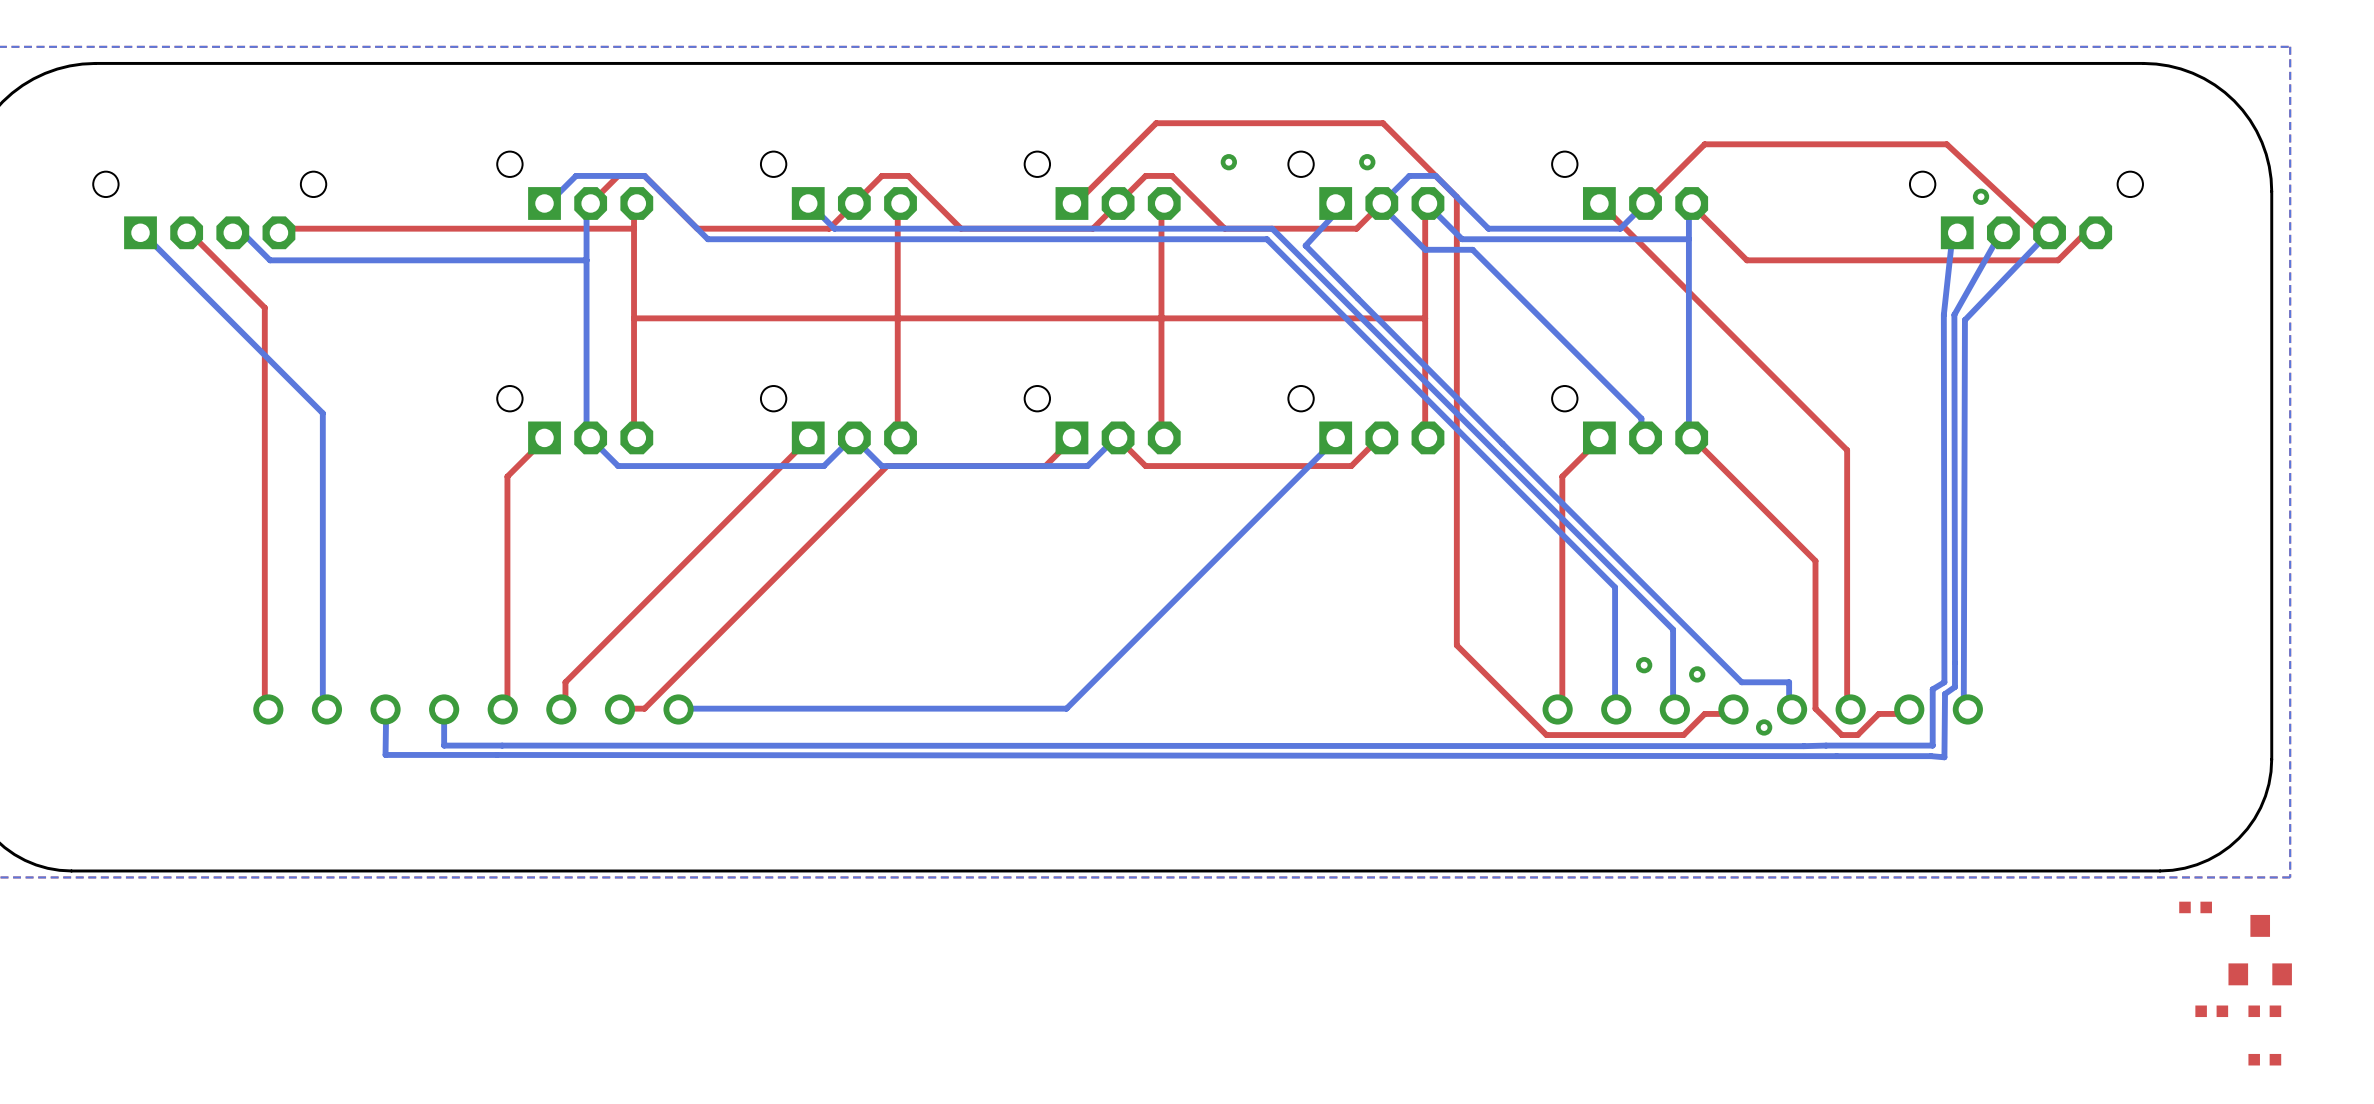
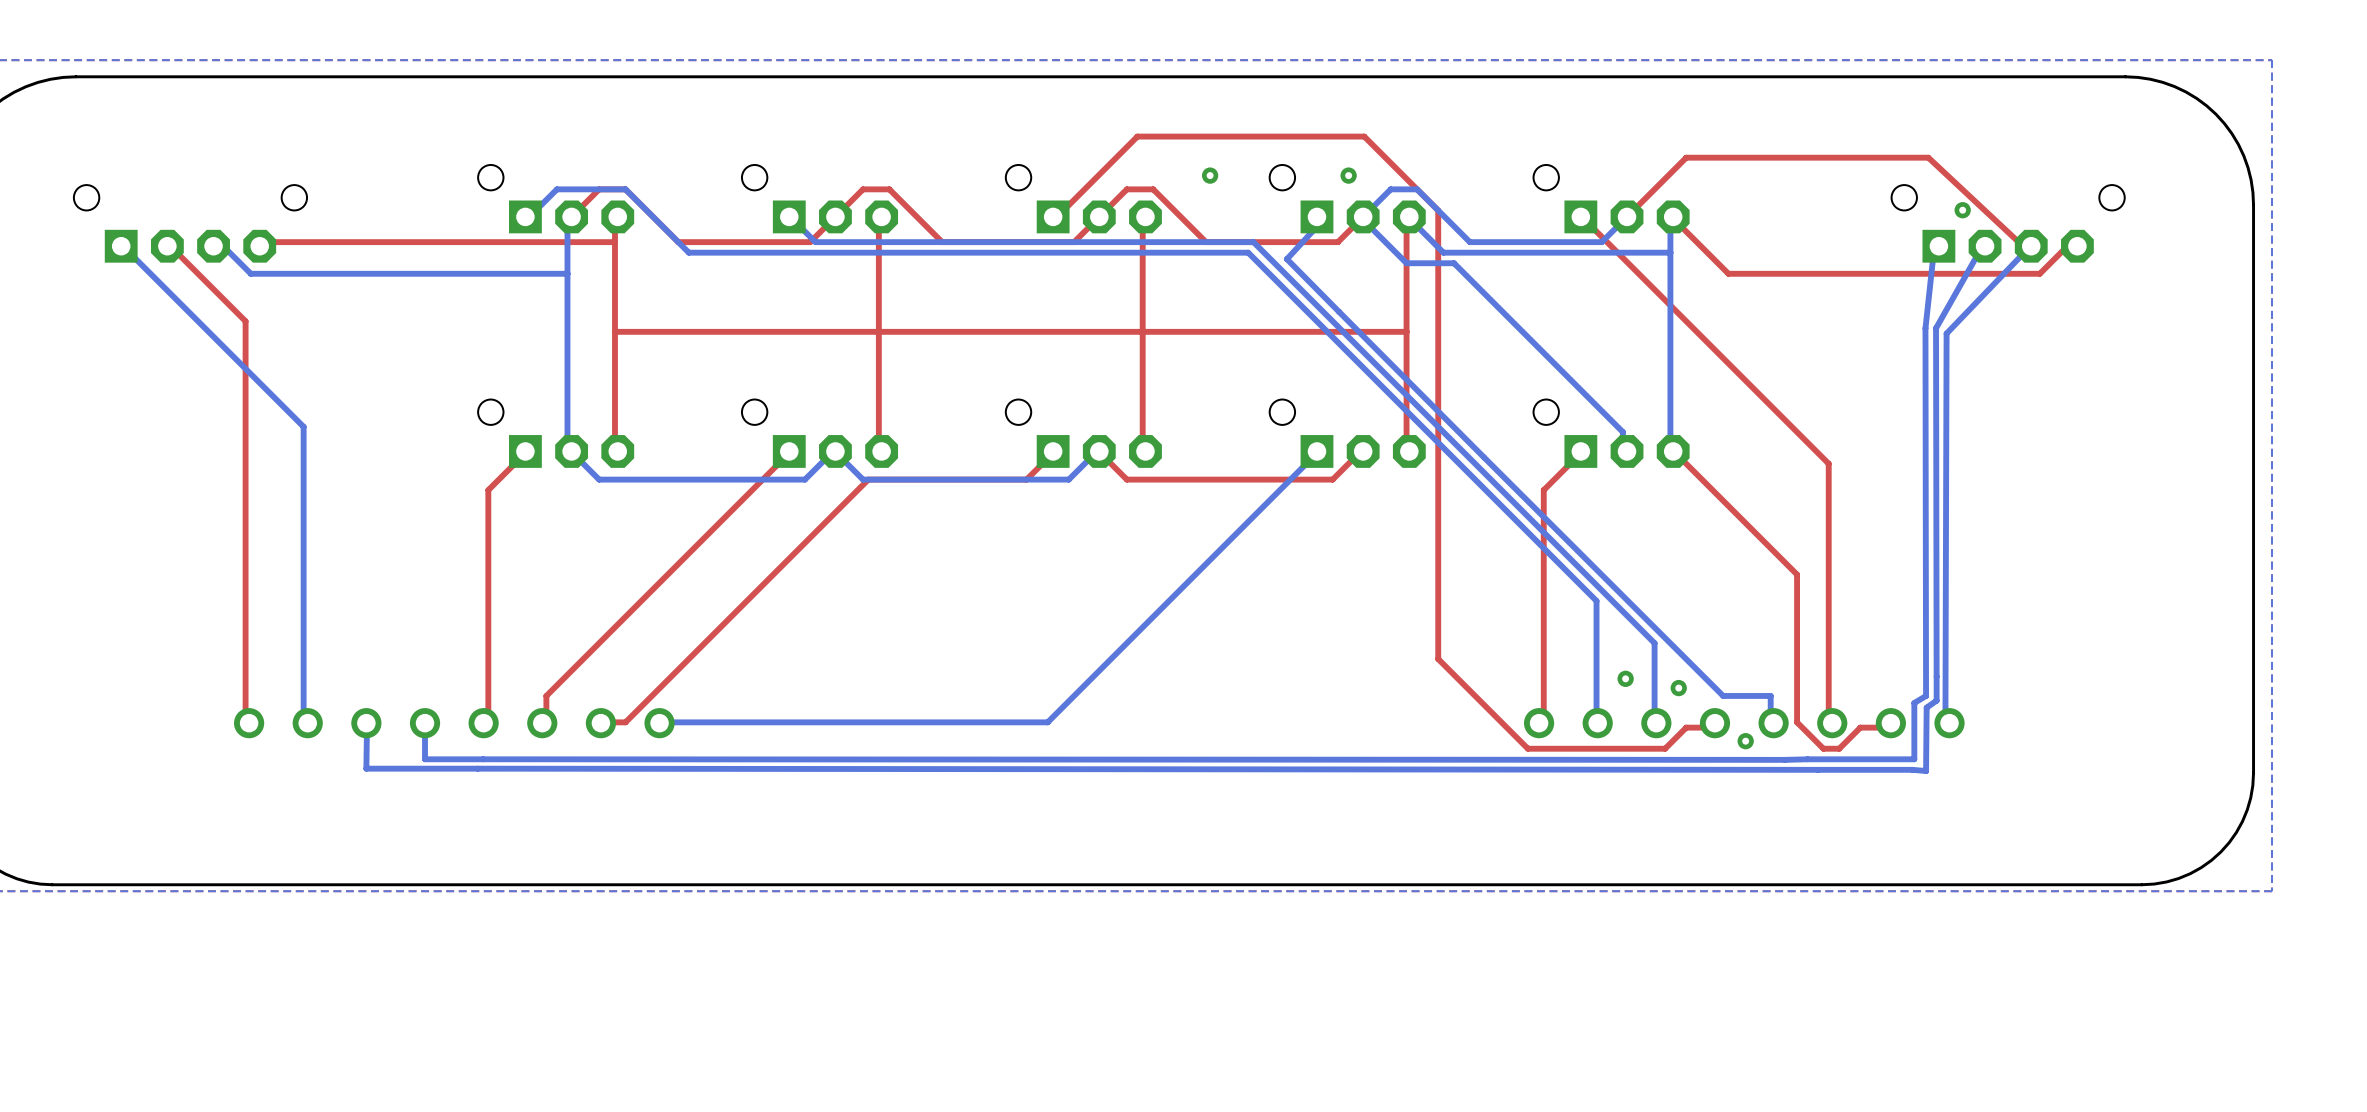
part: (2195, 907) -> none
part: (2260, 950) -> none
part: (2211, 1011) -> none
part: (2264, 1011) -> none
part: (2264, 1059) -> none

